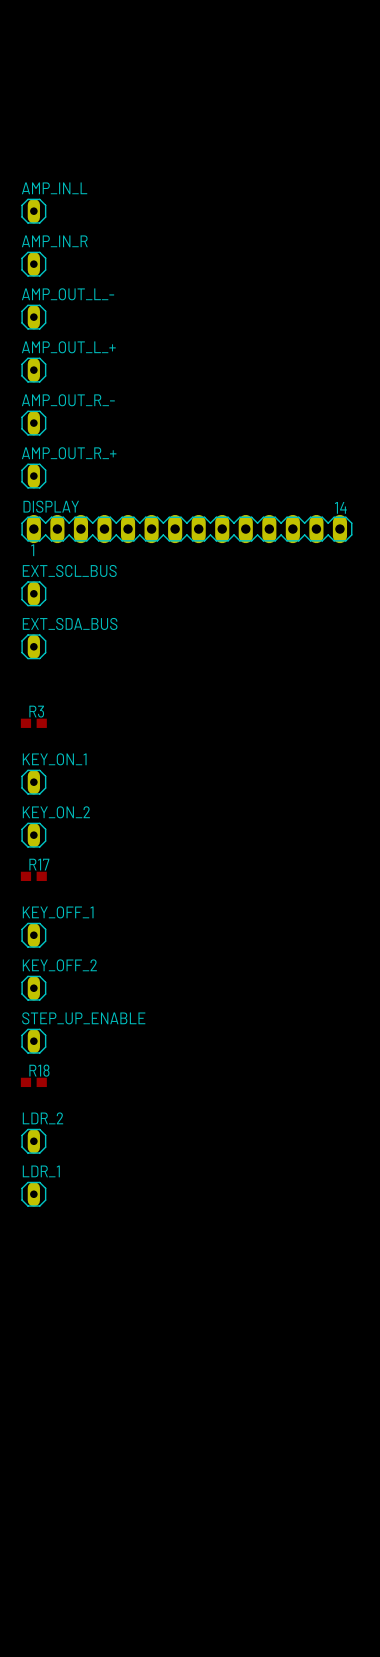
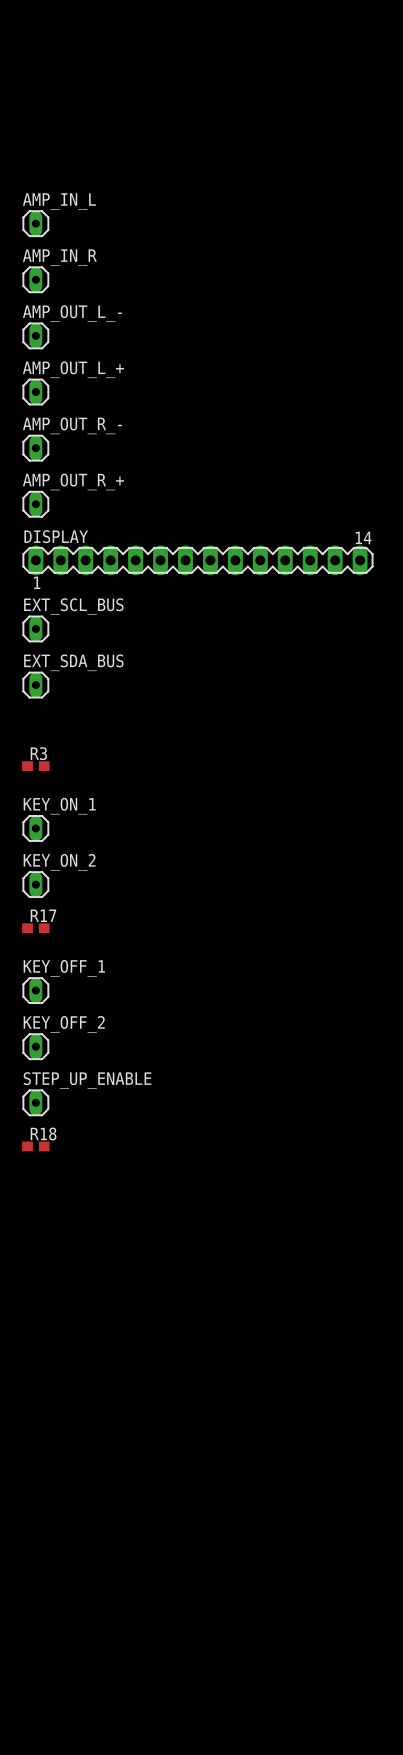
LDR_2: (33, 1141) -> none
LDR_1: (33, 1194) -> none

